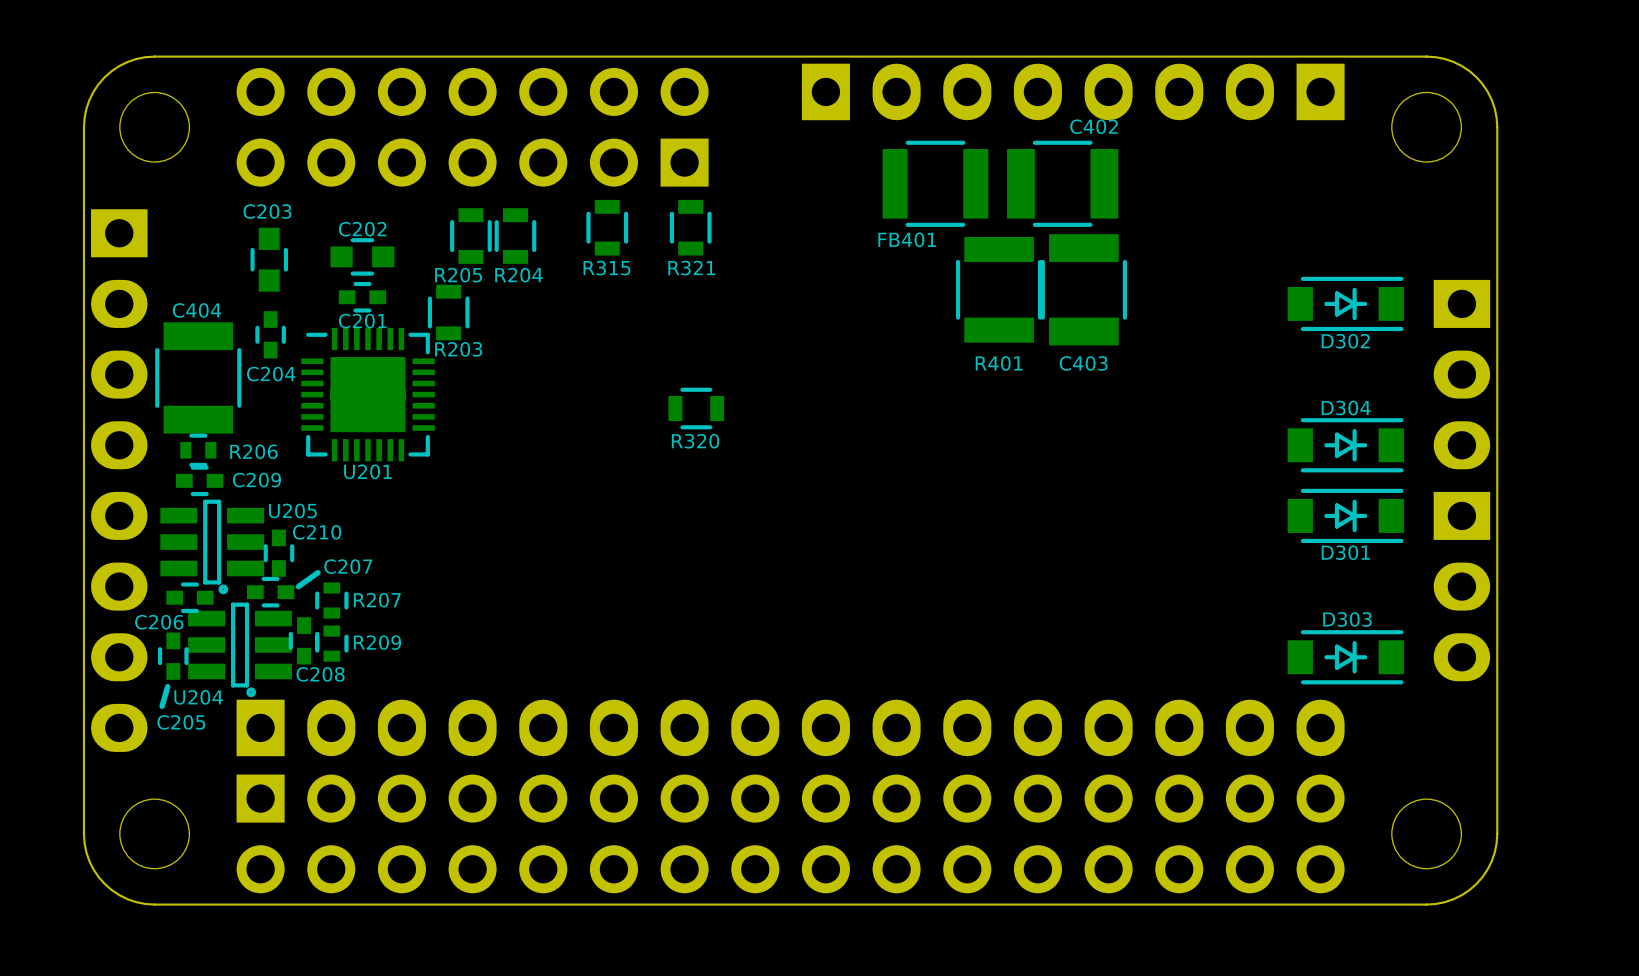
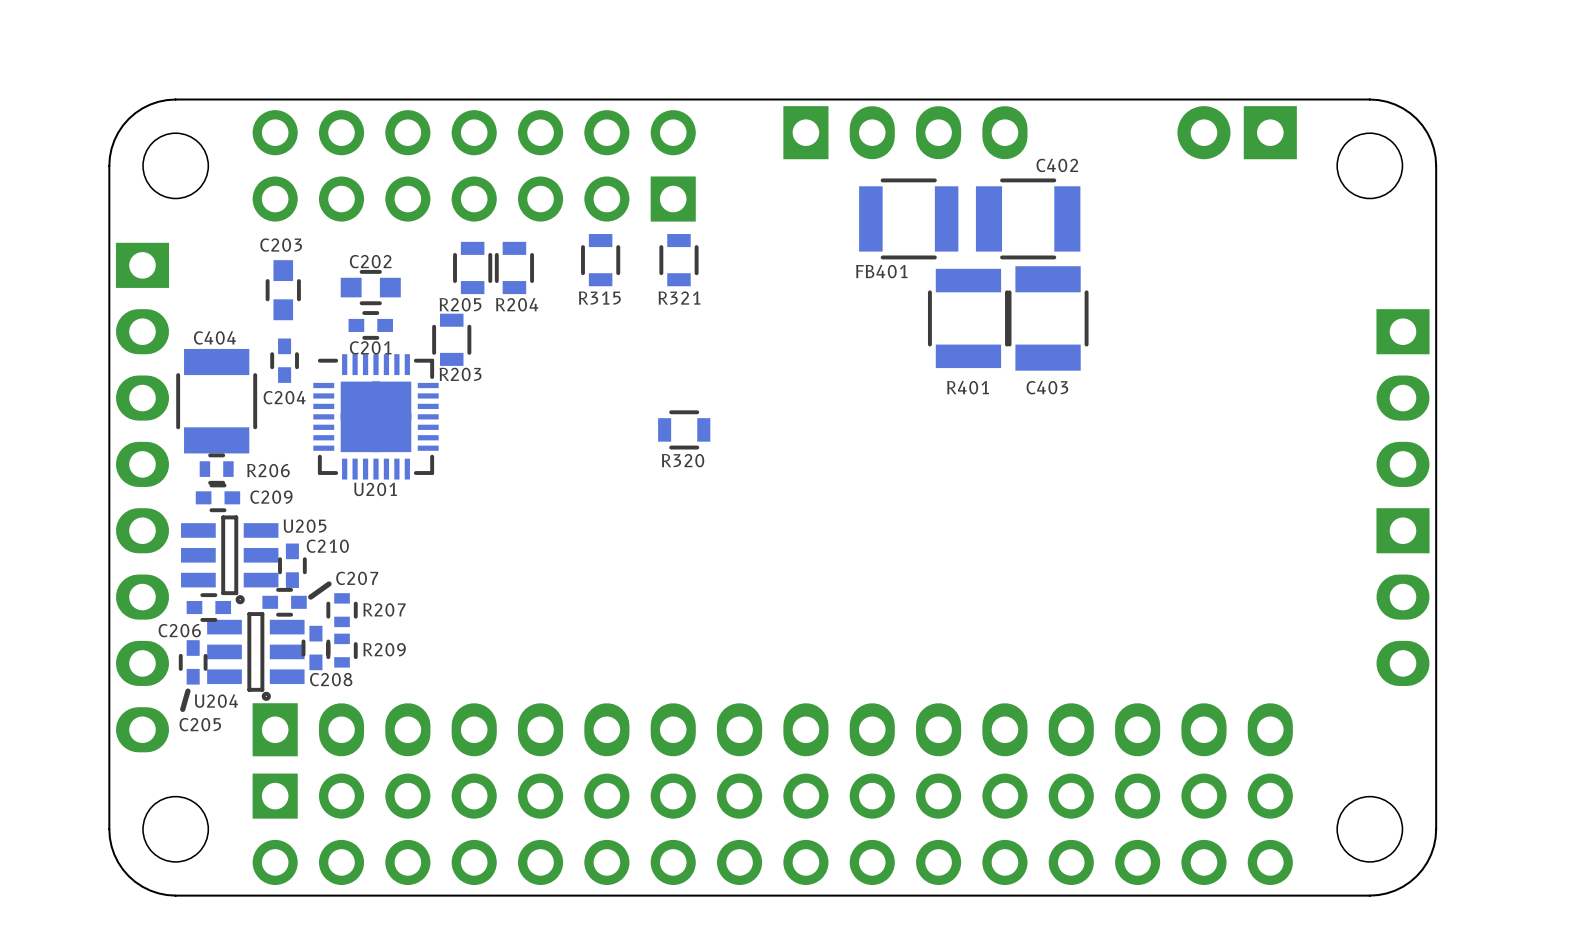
part: (1214, 91) -> none
part: none -> (1237, 132)
D302: (1345, 303) -> none
D304: (1345, 445) -> none
D301: (1345, 515) -> none
D303: (1345, 657) -> none

